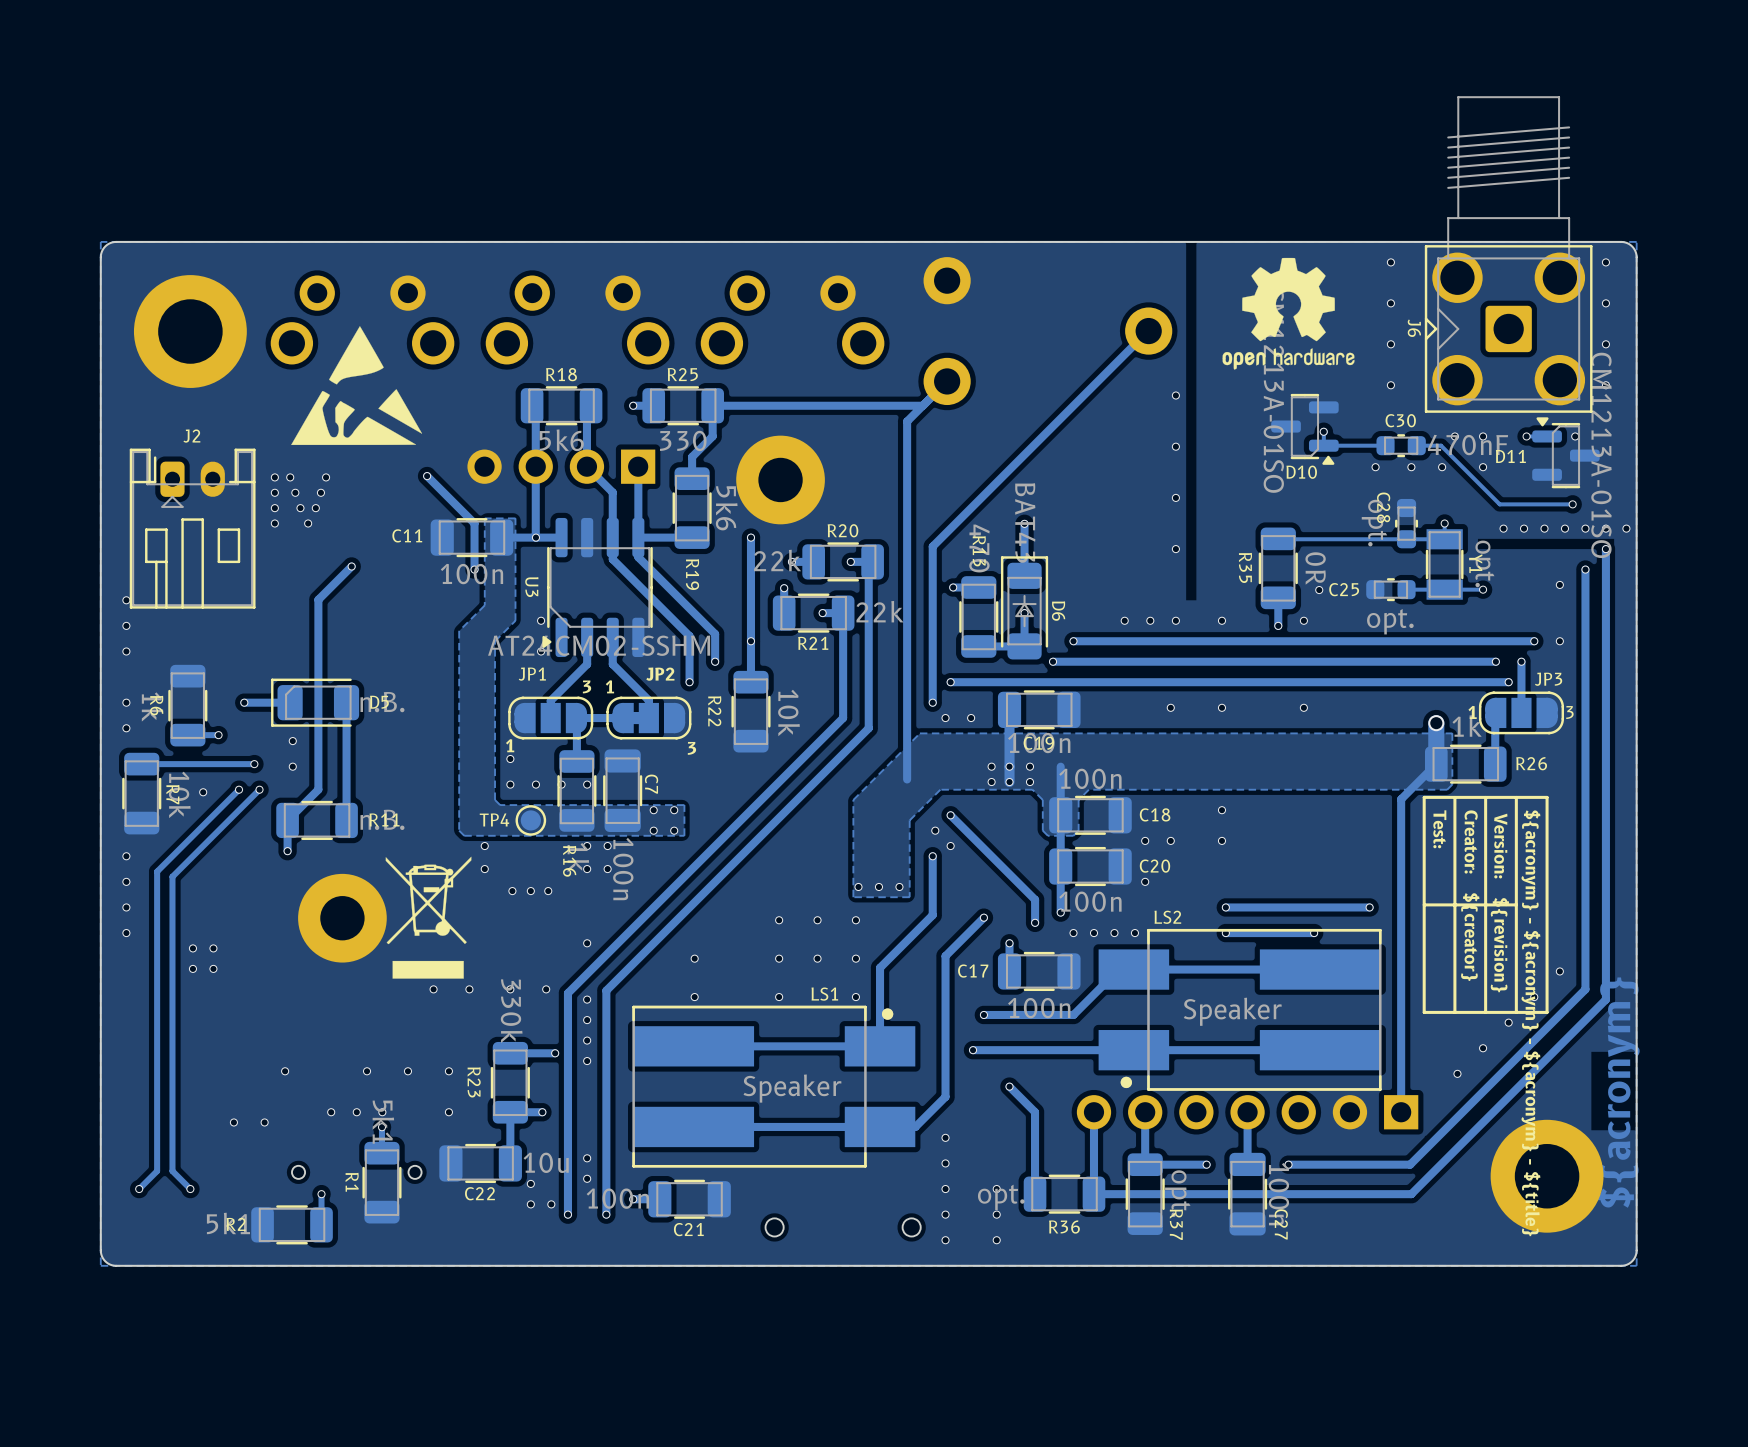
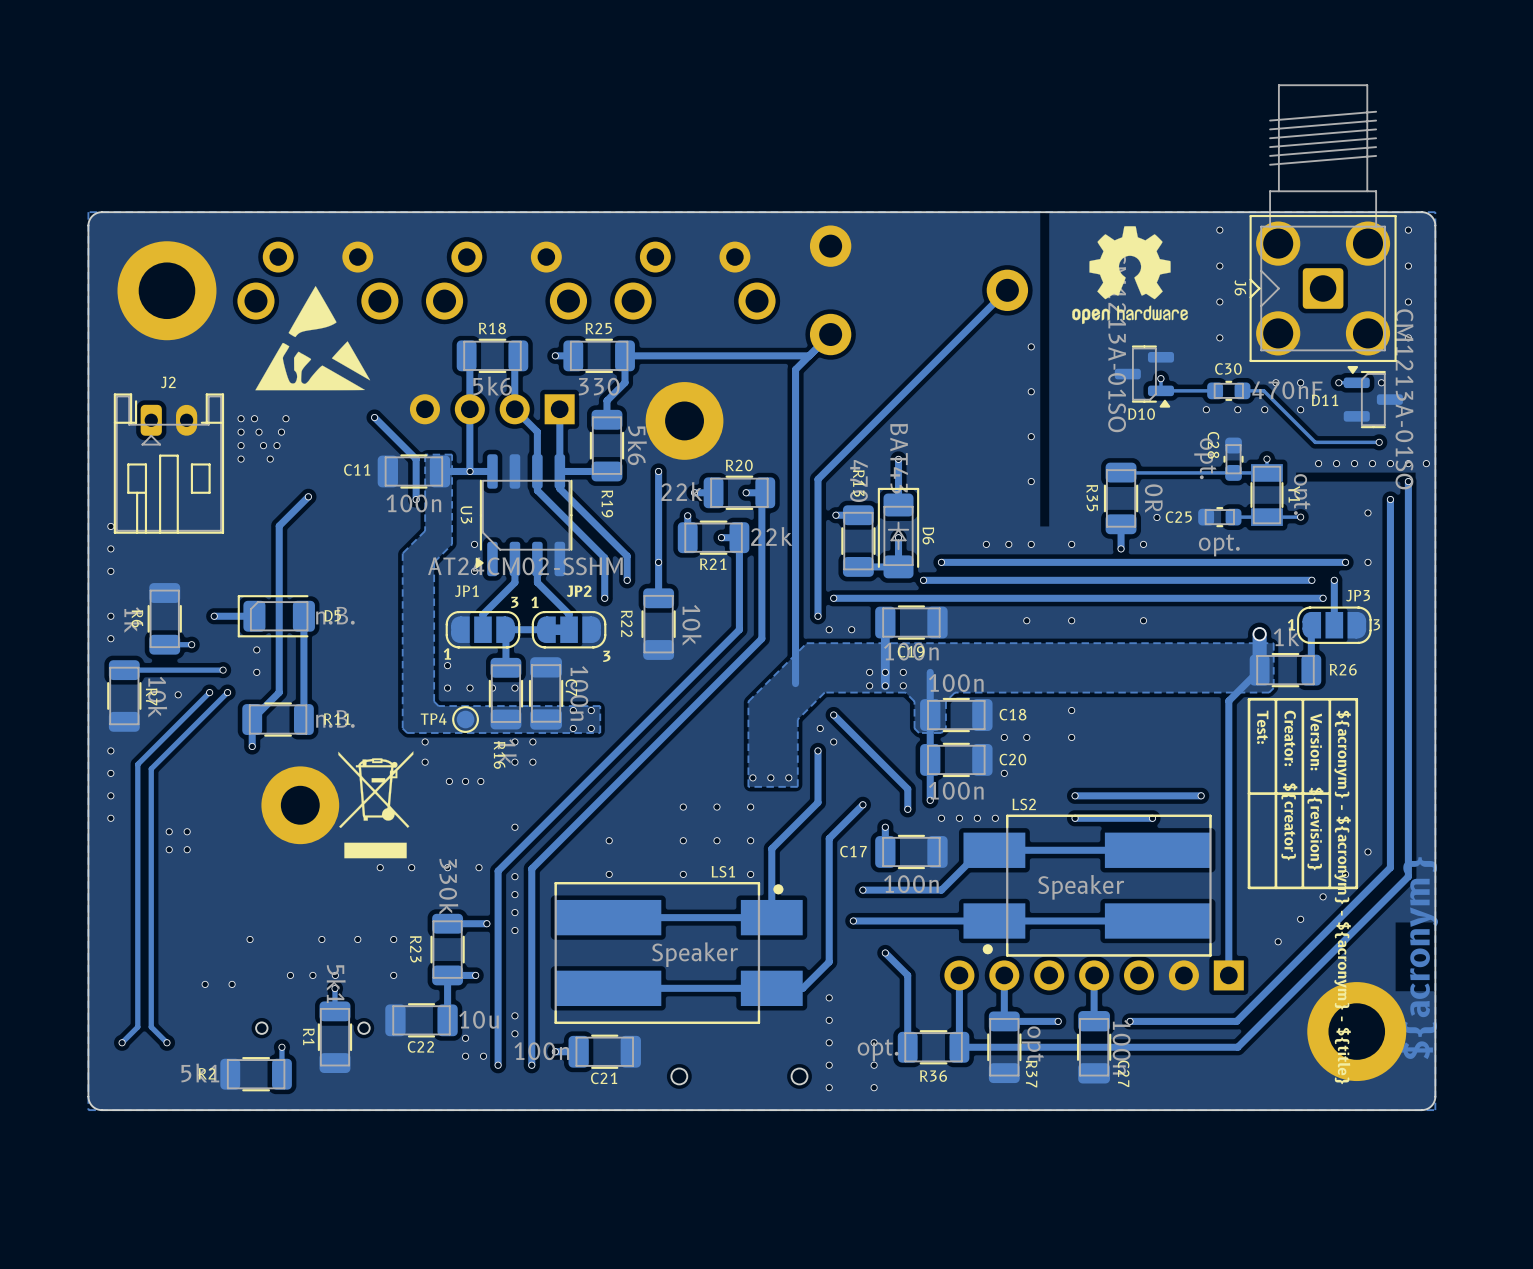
C7 value position: 100n (623, 869) -> 100n (579, 693)

